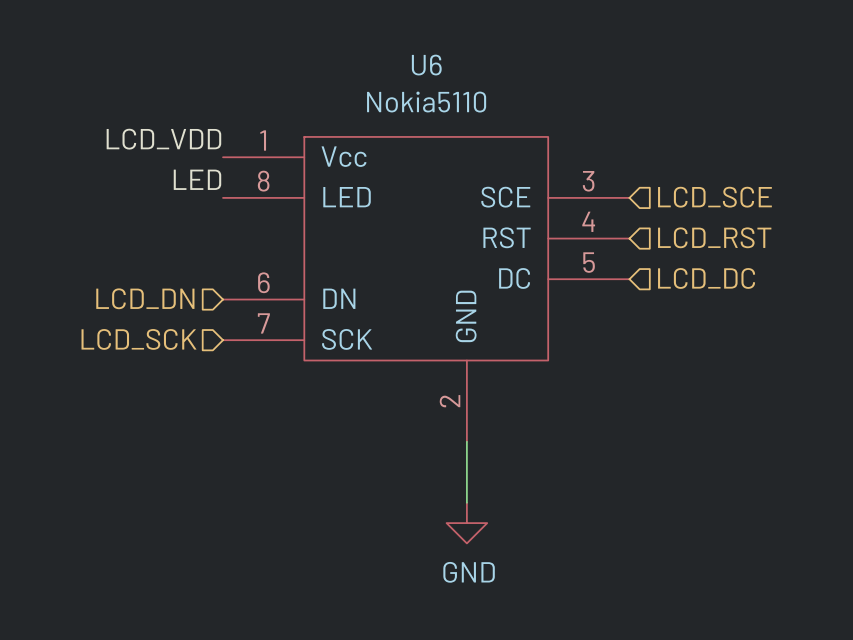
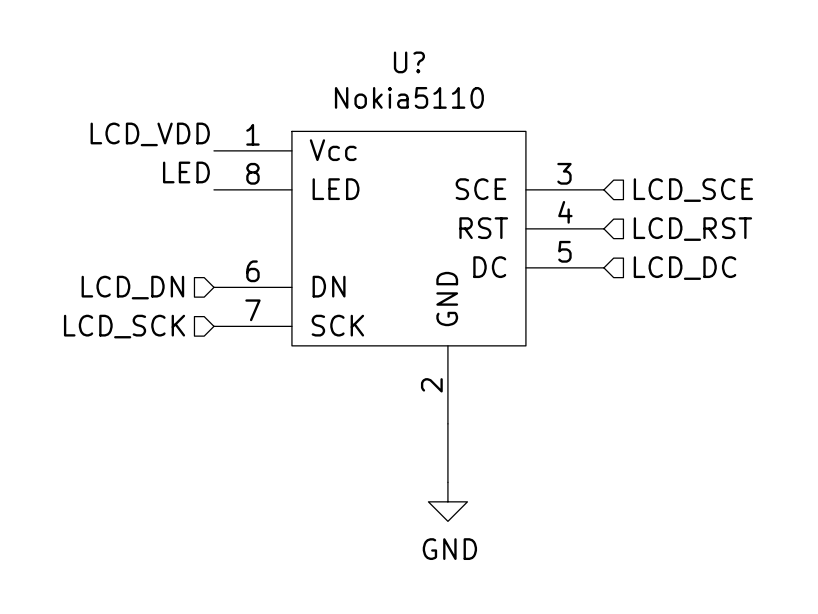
U6 name: U6 (426, 65) -> U? (409, 62)

